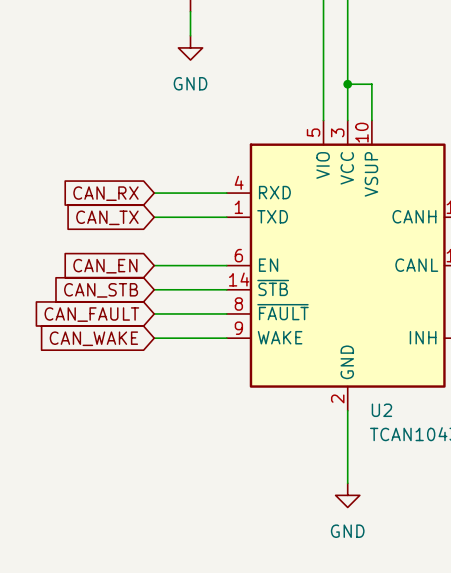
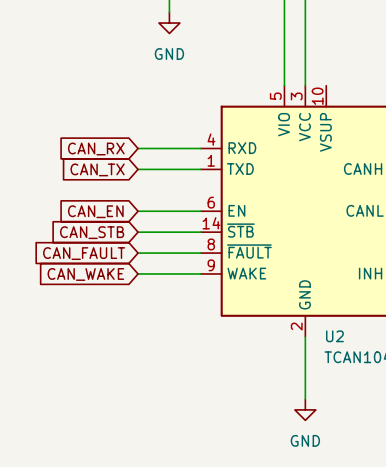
wire: (347, 84) (371, 84) (371, 120) -> none
junction: (347, 84) -> none

